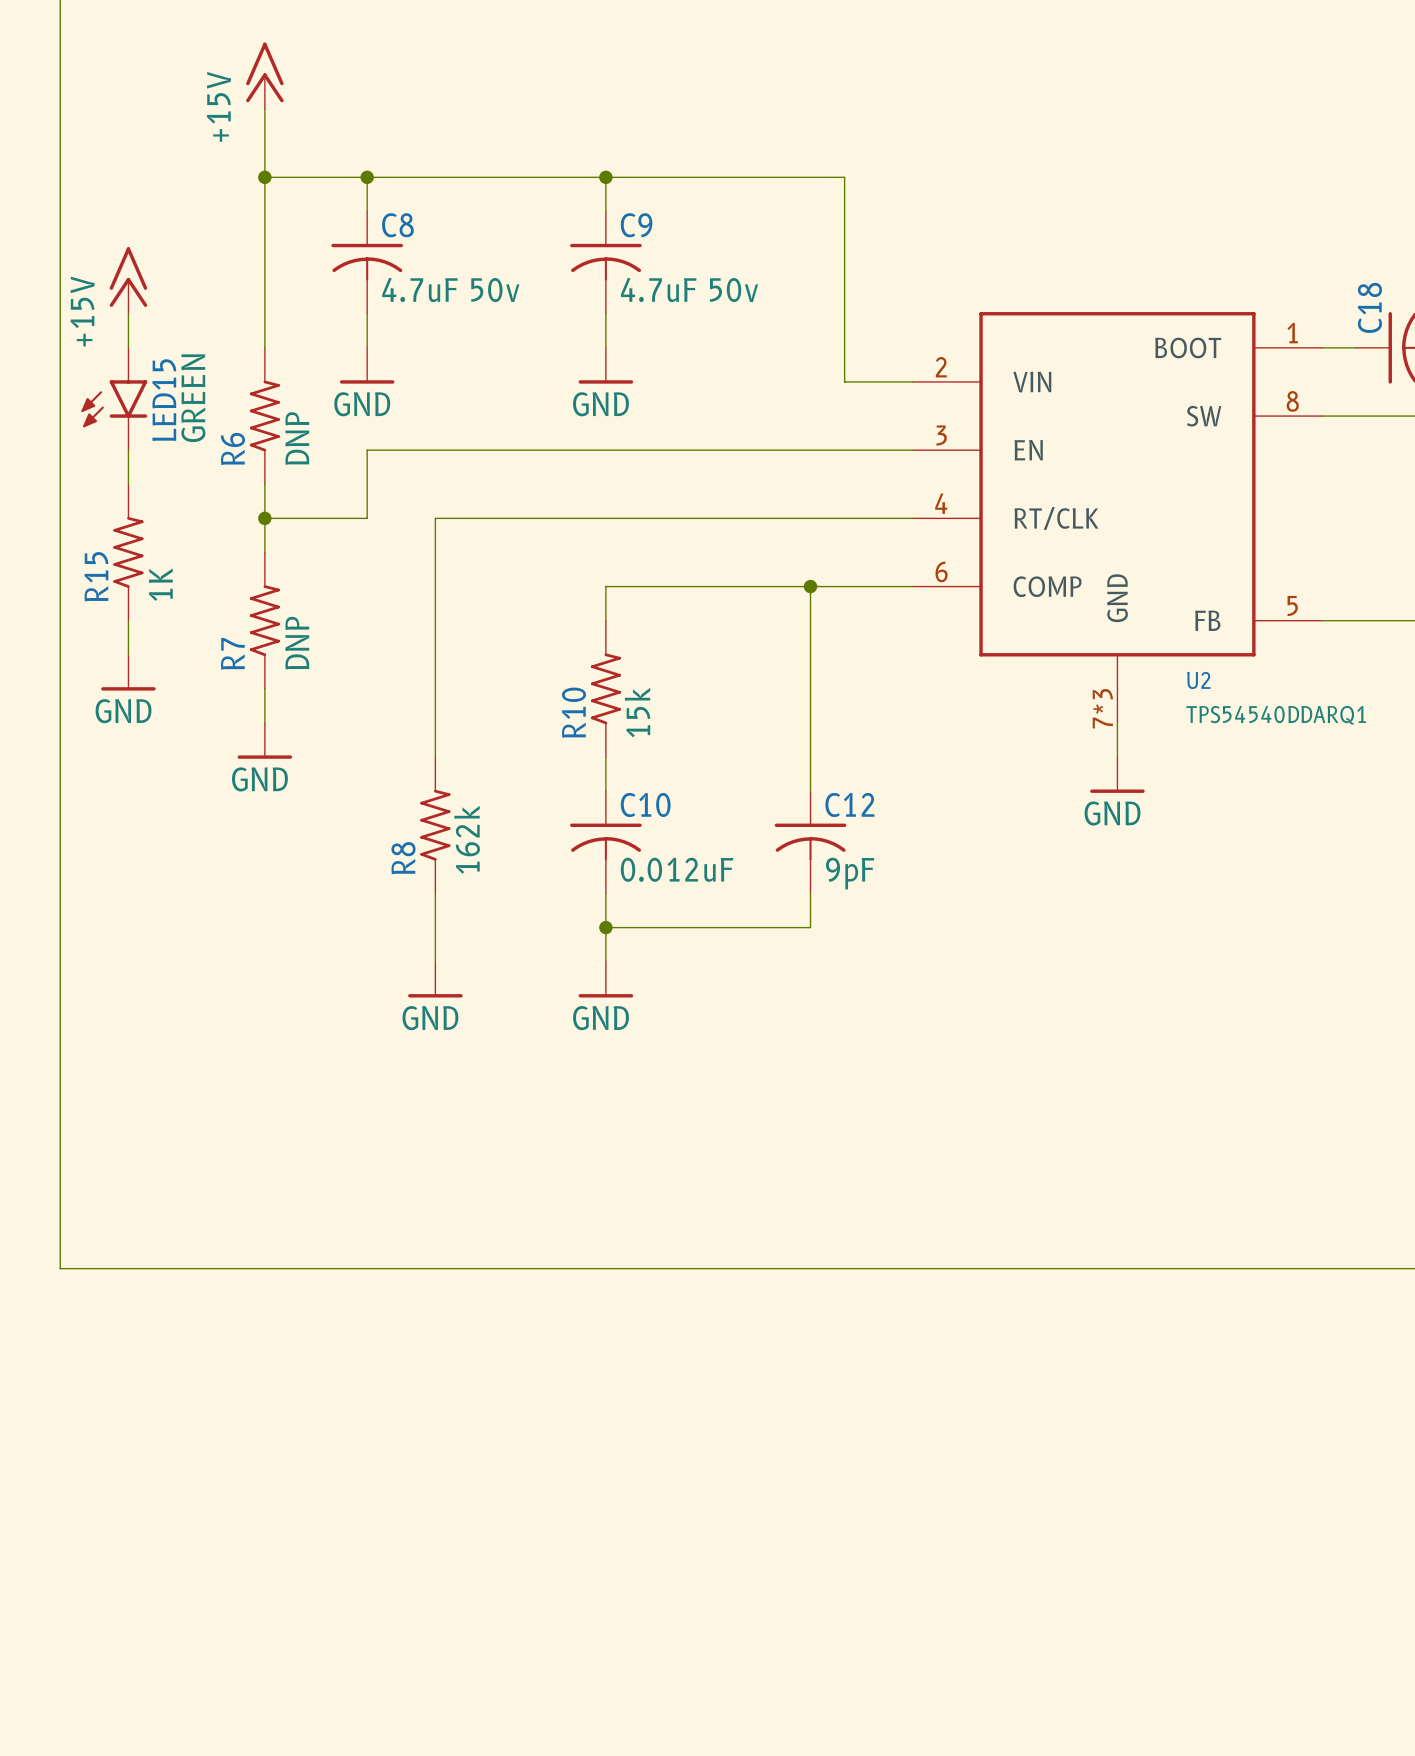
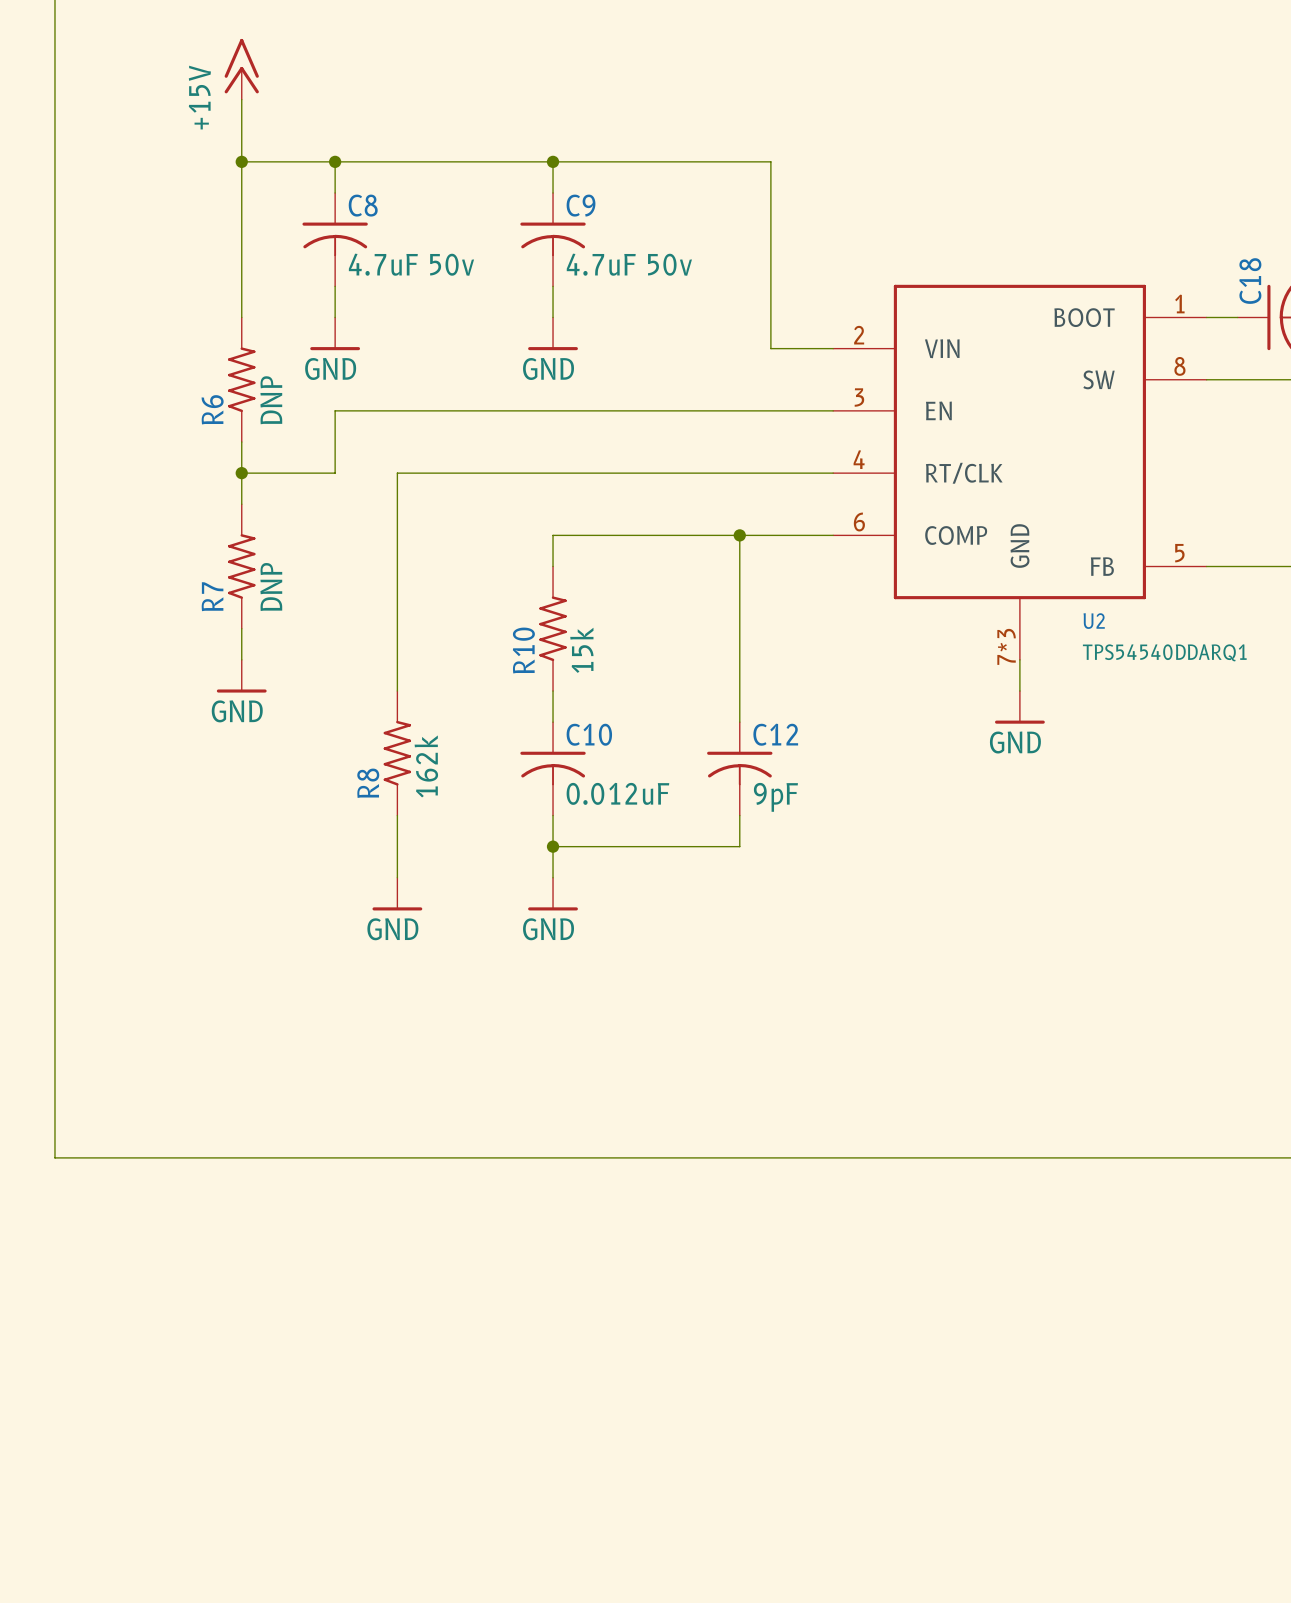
power symbol: +15V (128, 280) -> none
wire: (128, 313) (128, 347) -> none
LED15: GREEN (114, 399) -> none
wire: (128, 450) (128, 484) -> none
R15: 1K (128, 552) -> none
wire: (128, 620) (128, 654) -> none
power symbol: GND (128, 672) -> none

